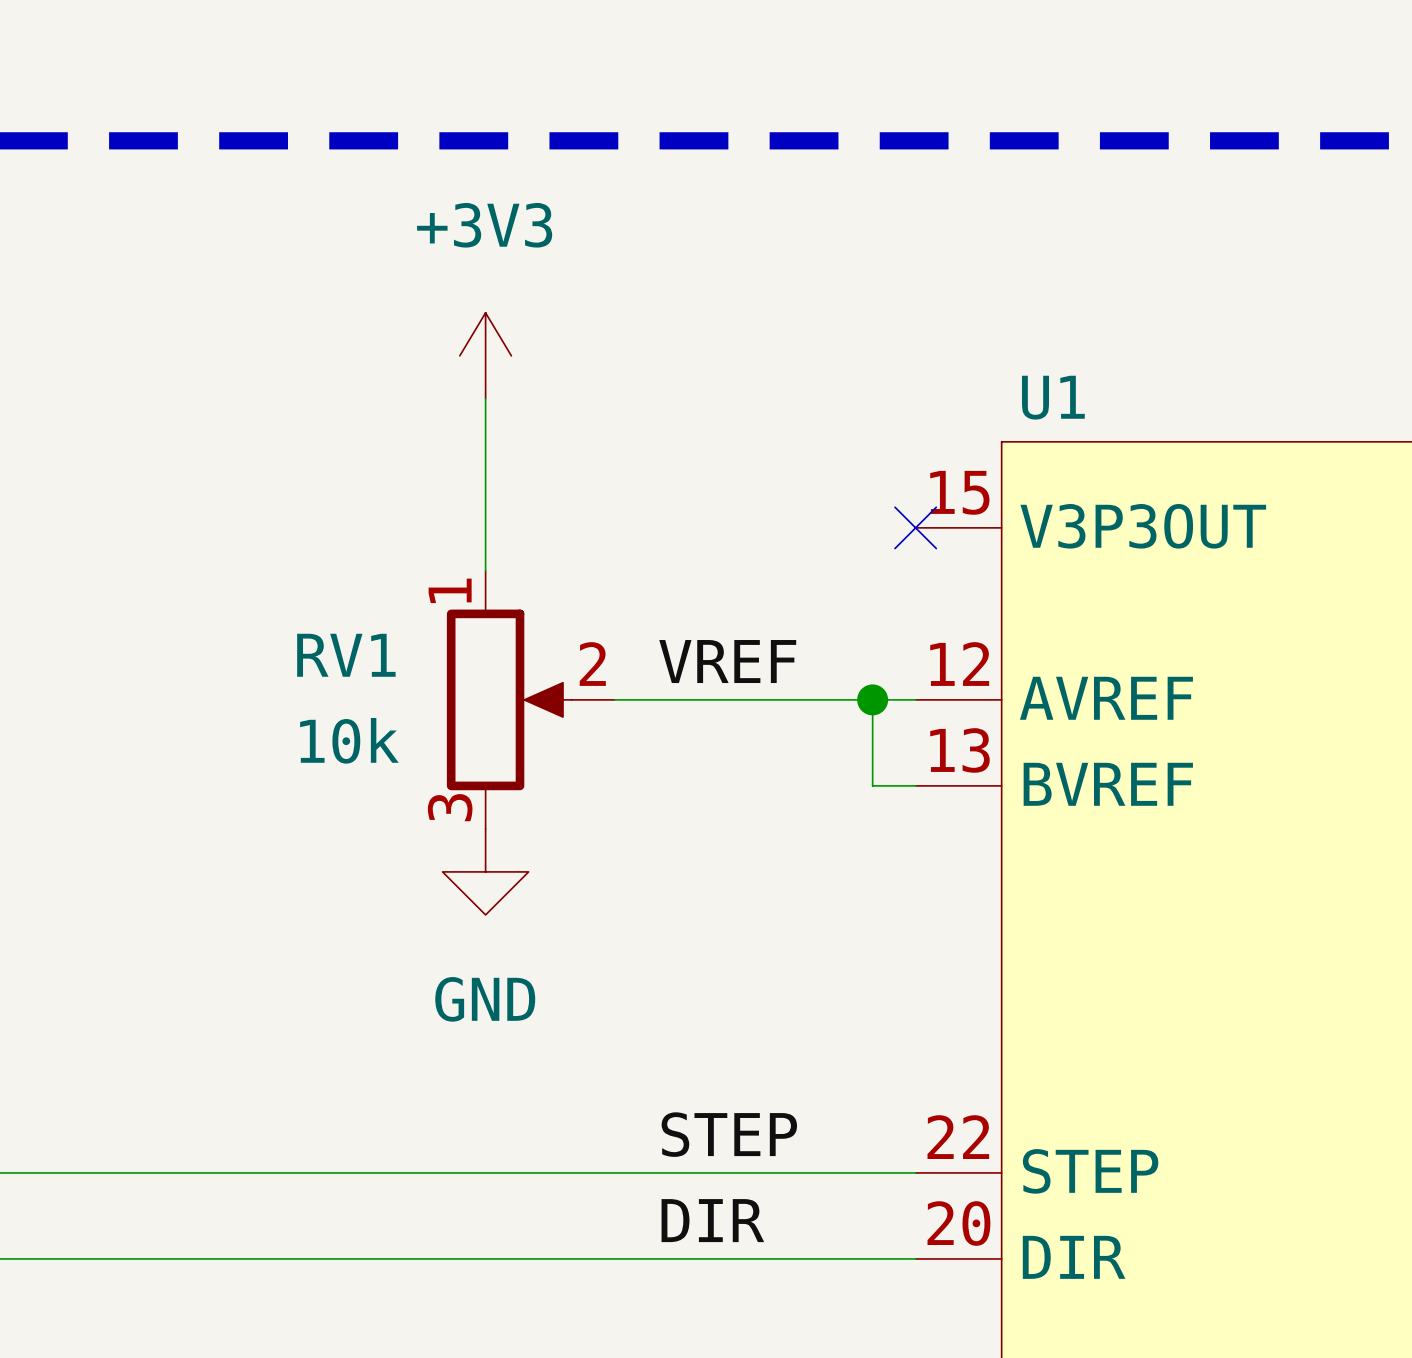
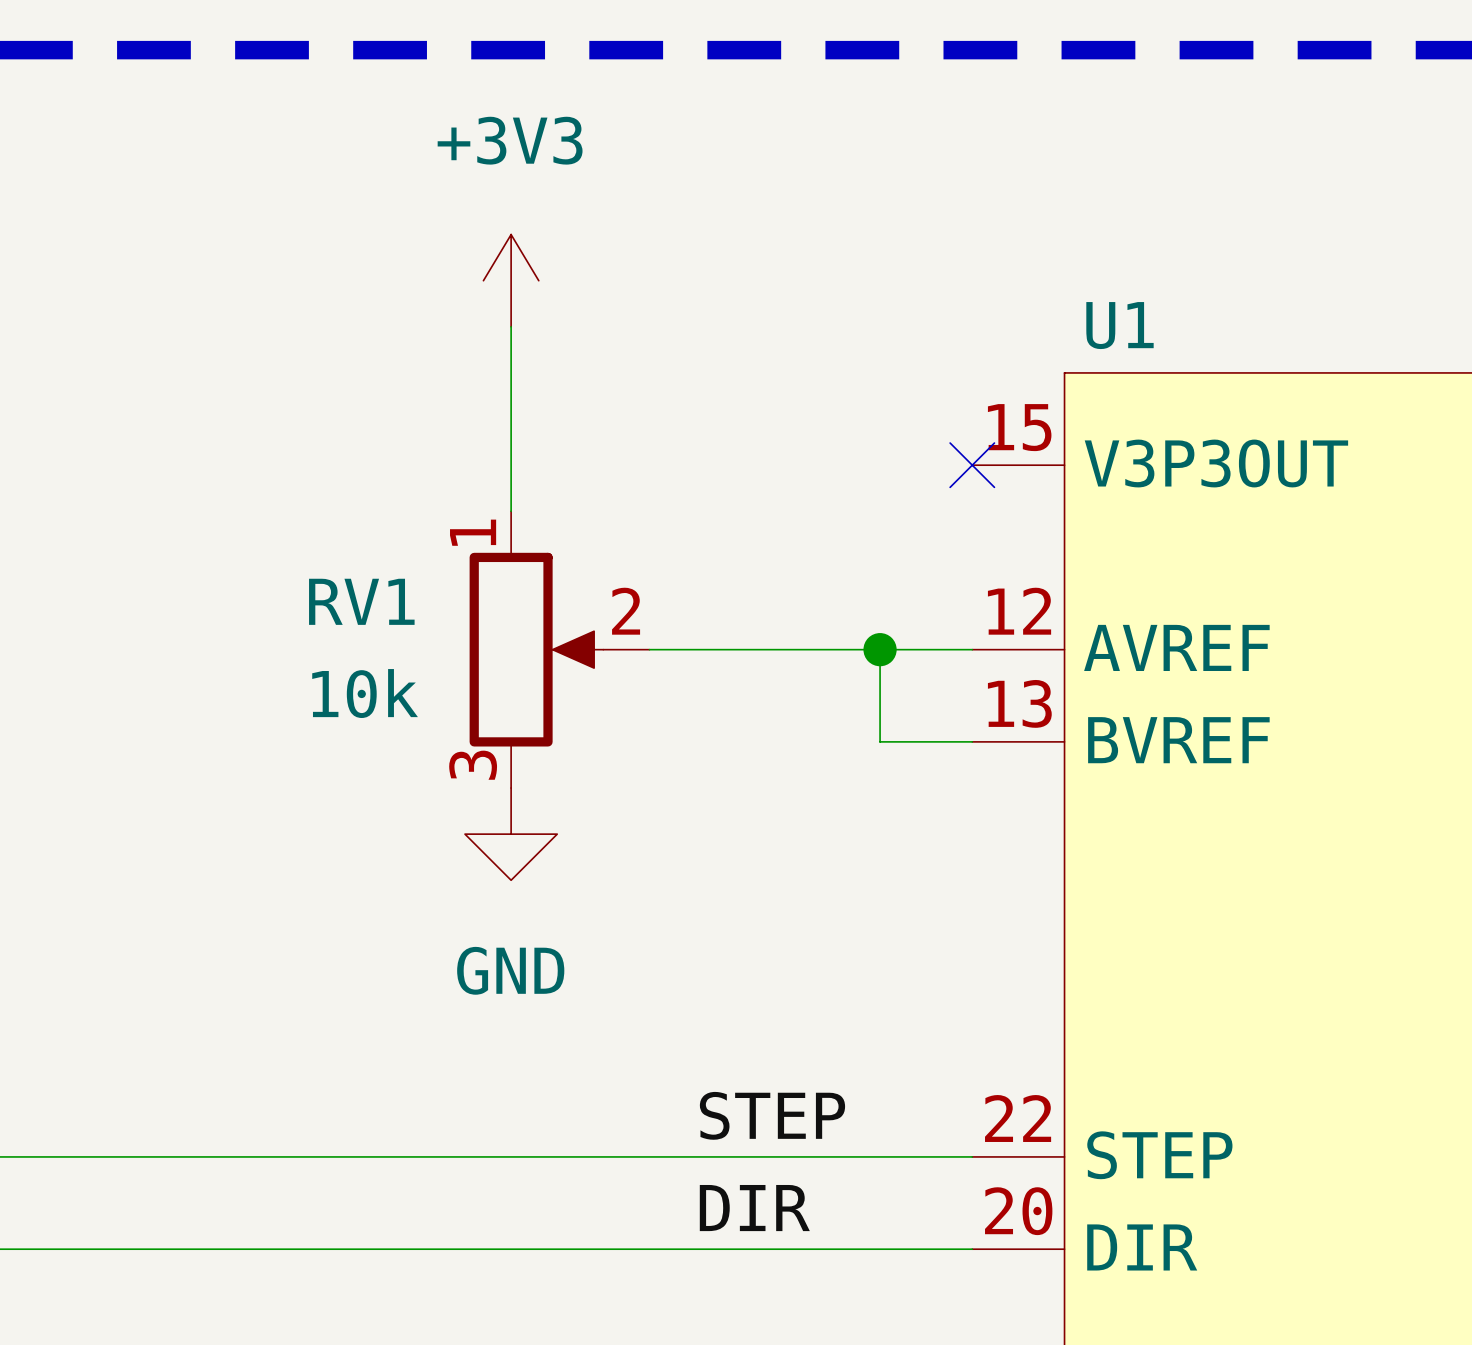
label: VREF (727, 661) -> none
wire: (872, 699) (872, 785) -> (880, 649) (880, 741) (926, 741)
junction position: (872, 699) -> (880, 649)

